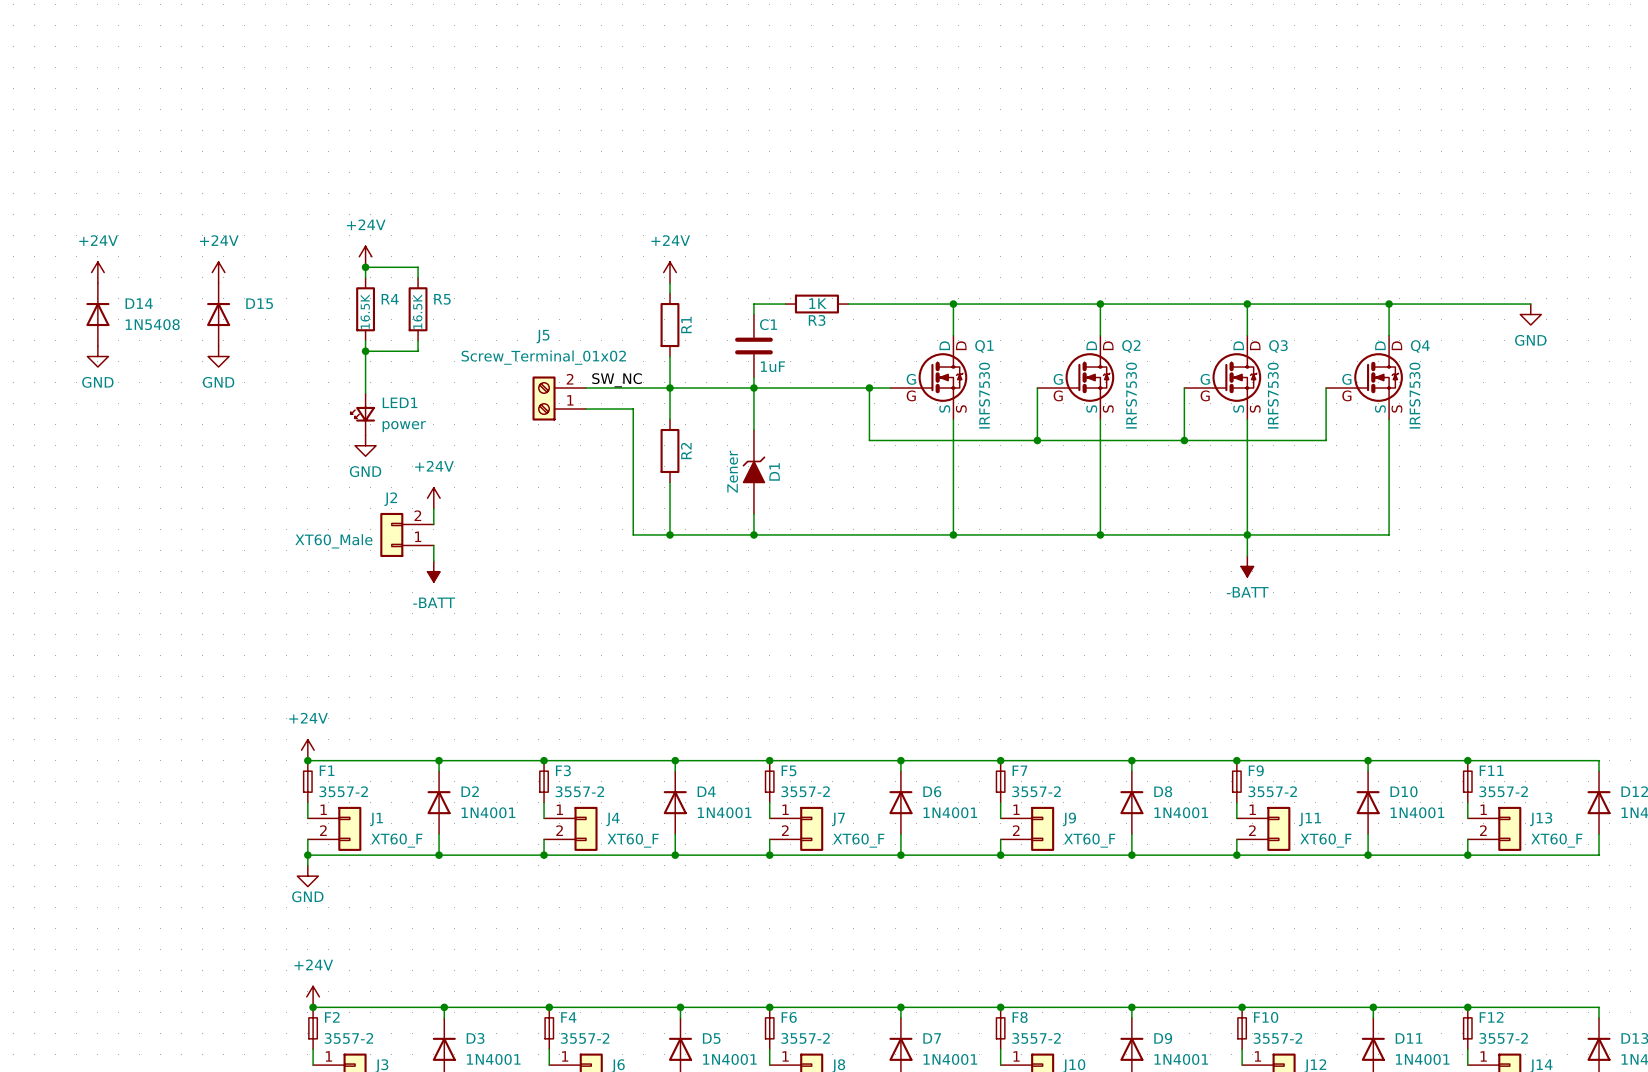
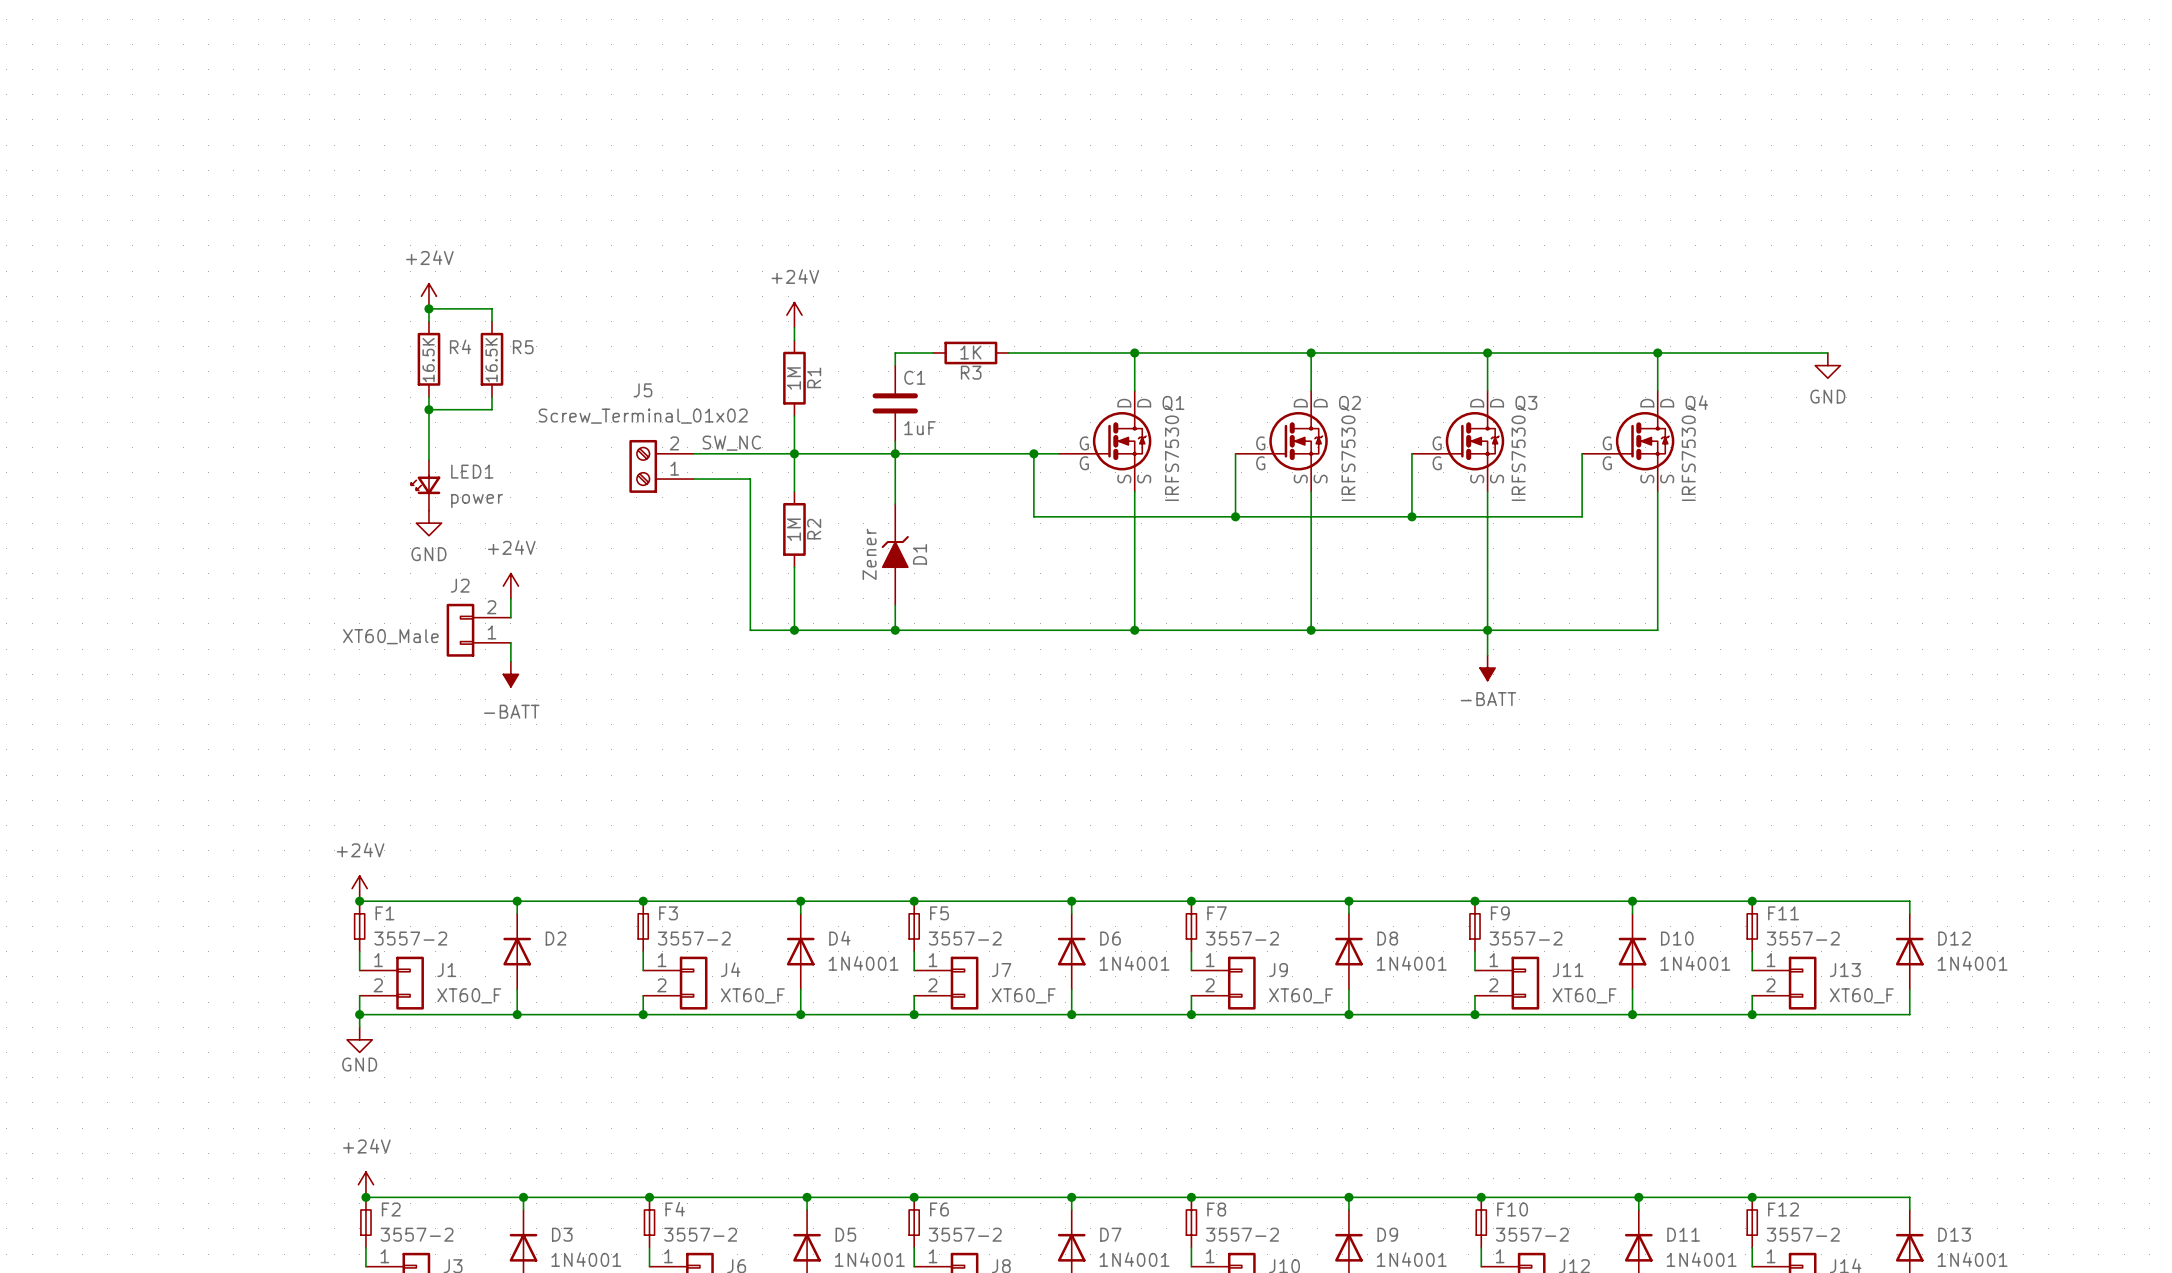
power symbol: +24V (97, 272) -> none
power symbol: +24V (218, 272) -> none
D14: 1N5408 (97, 314) -> none
D15: (218, 314) -> none
R1 value: none -> 1M (793, 378)
power symbol: GND (97, 356) -> none
power symbol: GND (218, 356) -> none
R2 value: none -> 1M (793, 529)
D2 value: 1N4001 (488, 812) -> none

